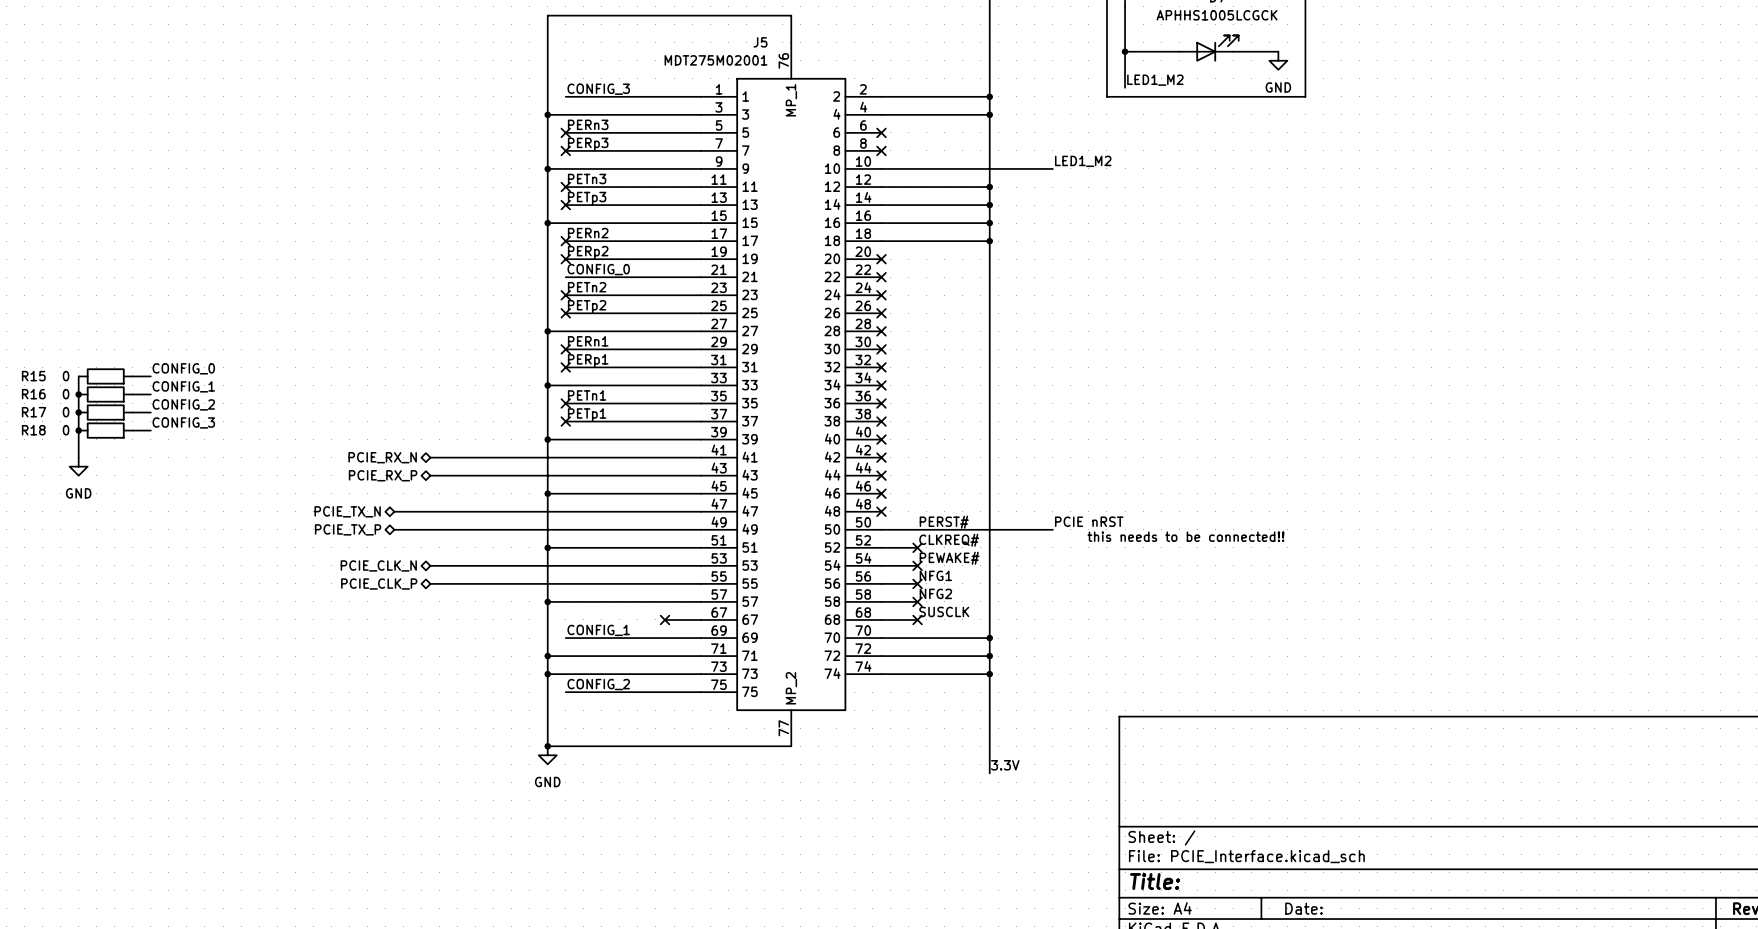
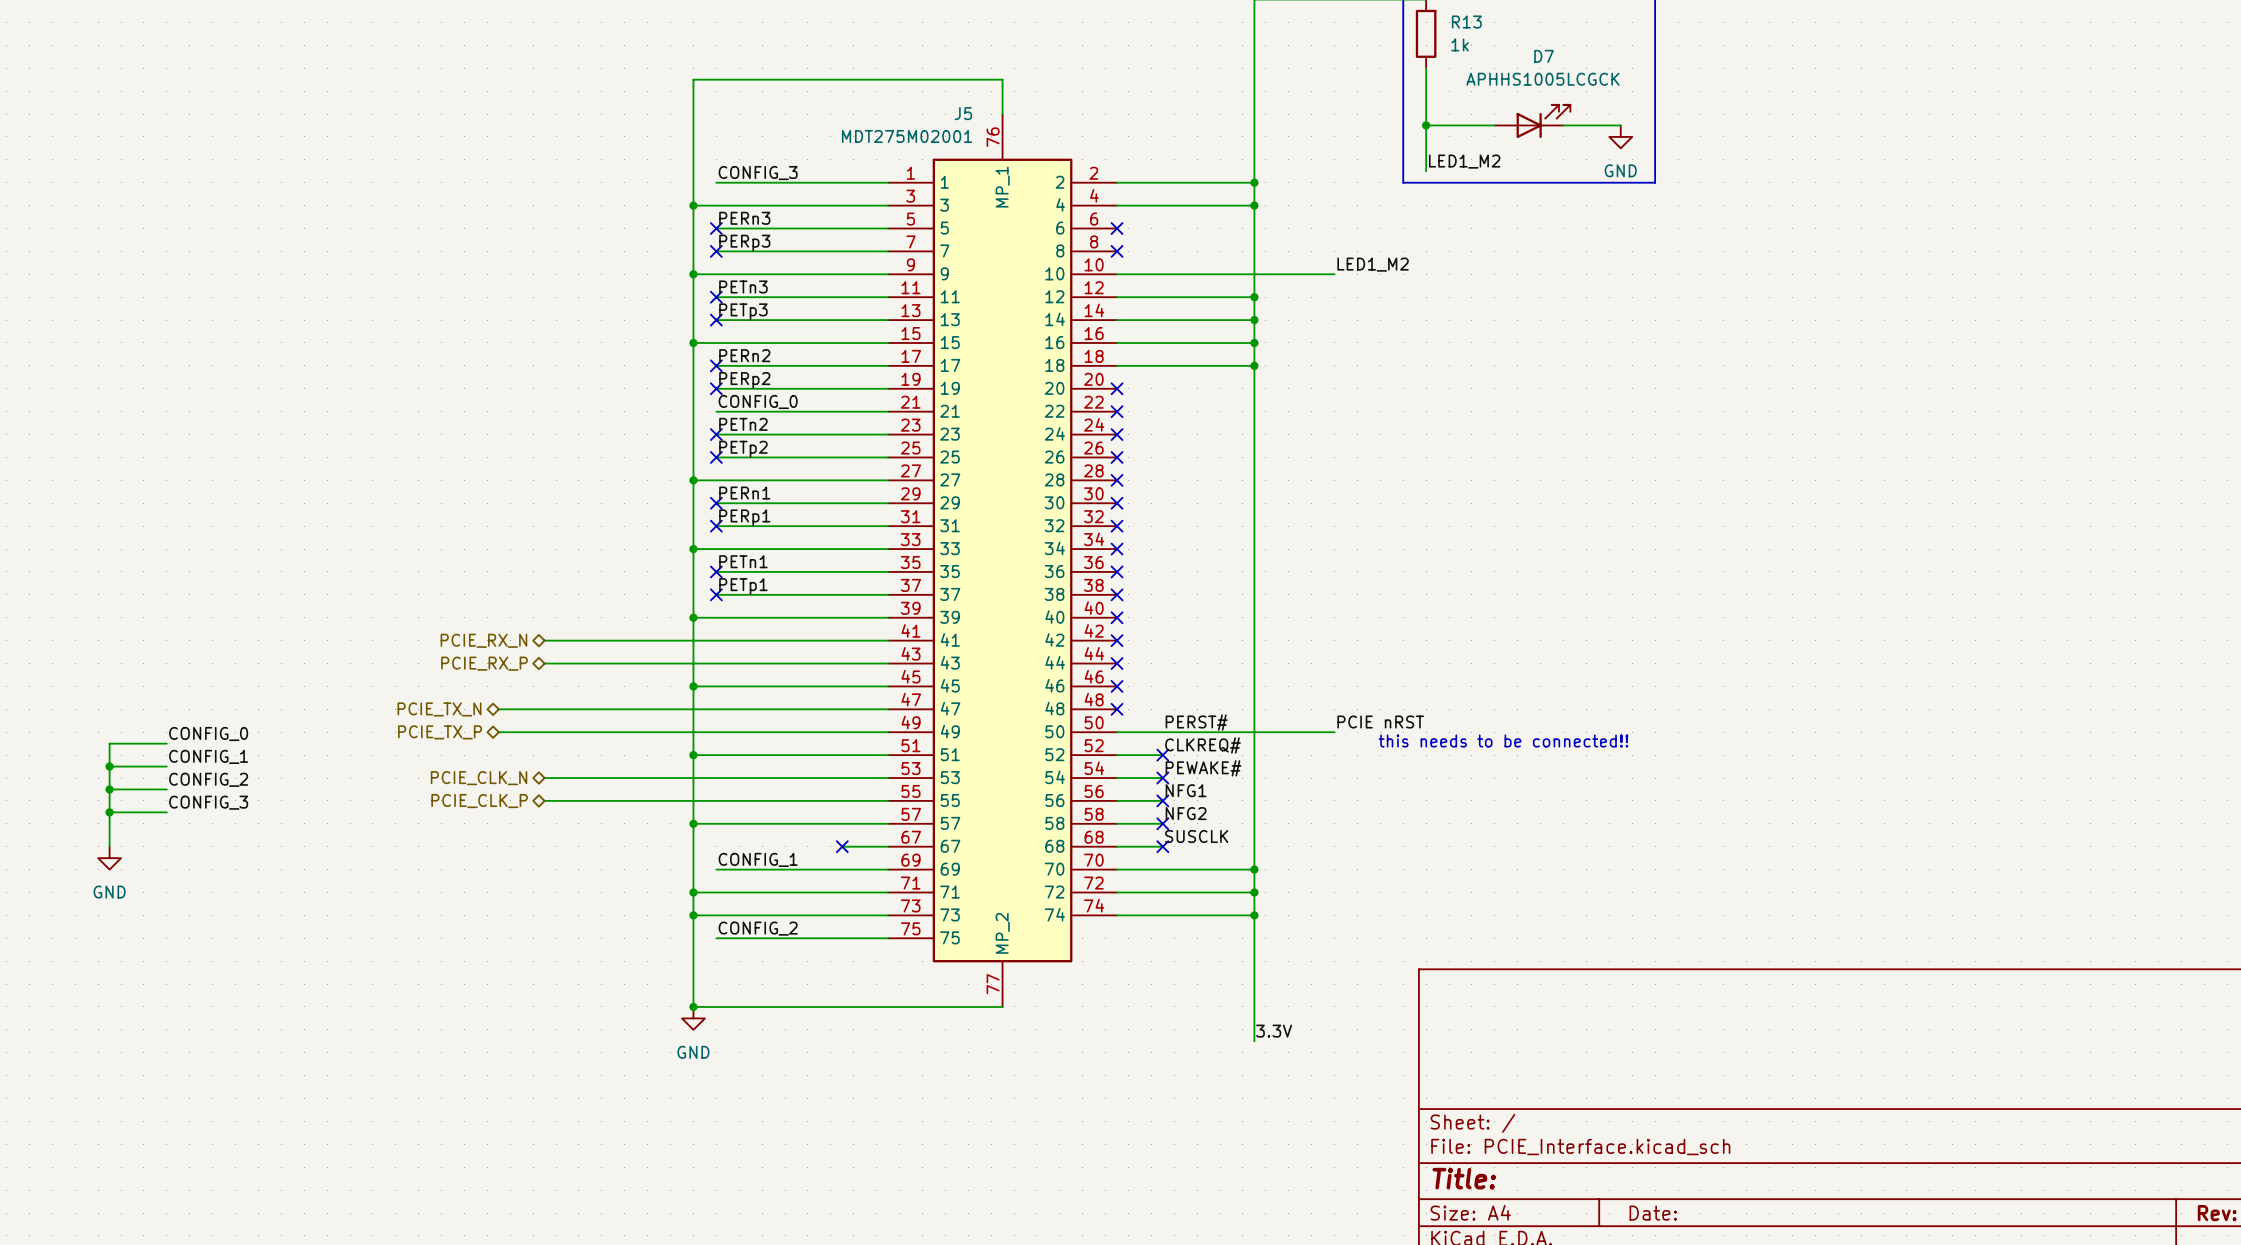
label position: CONFIG_0 (183, 368) -> CONFIG_0 (208, 734)
wire: (78, 376) (78, 457) -> none
R15: 0 (105, 376) -> none
wire: (132, 376) (150, 376) -> none
label position: CONFIG_1 (183, 386) -> CONFIG_1 (208, 756)
junction: (78, 394) -> none
R16: 0 (105, 394) -> none
wire: (132, 394) (150, 394) -> none
label position: CONFIG_2 (183, 404) -> CONFIG_2 (208, 779)
junction: (78, 412) -> none
R17: 0 (105, 412) -> none
wire: (132, 412) (150, 412) -> none
label position: CONFIG_3 (183, 422) -> CONFIG_3 (208, 802)
junction: (78, 430) -> none
R18: 0 (105, 430) -> none
wire: (132, 430) (150, 430) -> none
power symbol position: GND (78, 466) -> GND (109, 858)
wire: none -> (166, 743) (109, 743) (109, 846)
wire: none -> (109, 766) (166, 766)
junction: none -> (109, 766)
wire: none -> (109, 789) (166, 789)
junction: none -> (109, 789)
wire: none -> (109, 812) (166, 812)
junction: none -> (109, 812)

